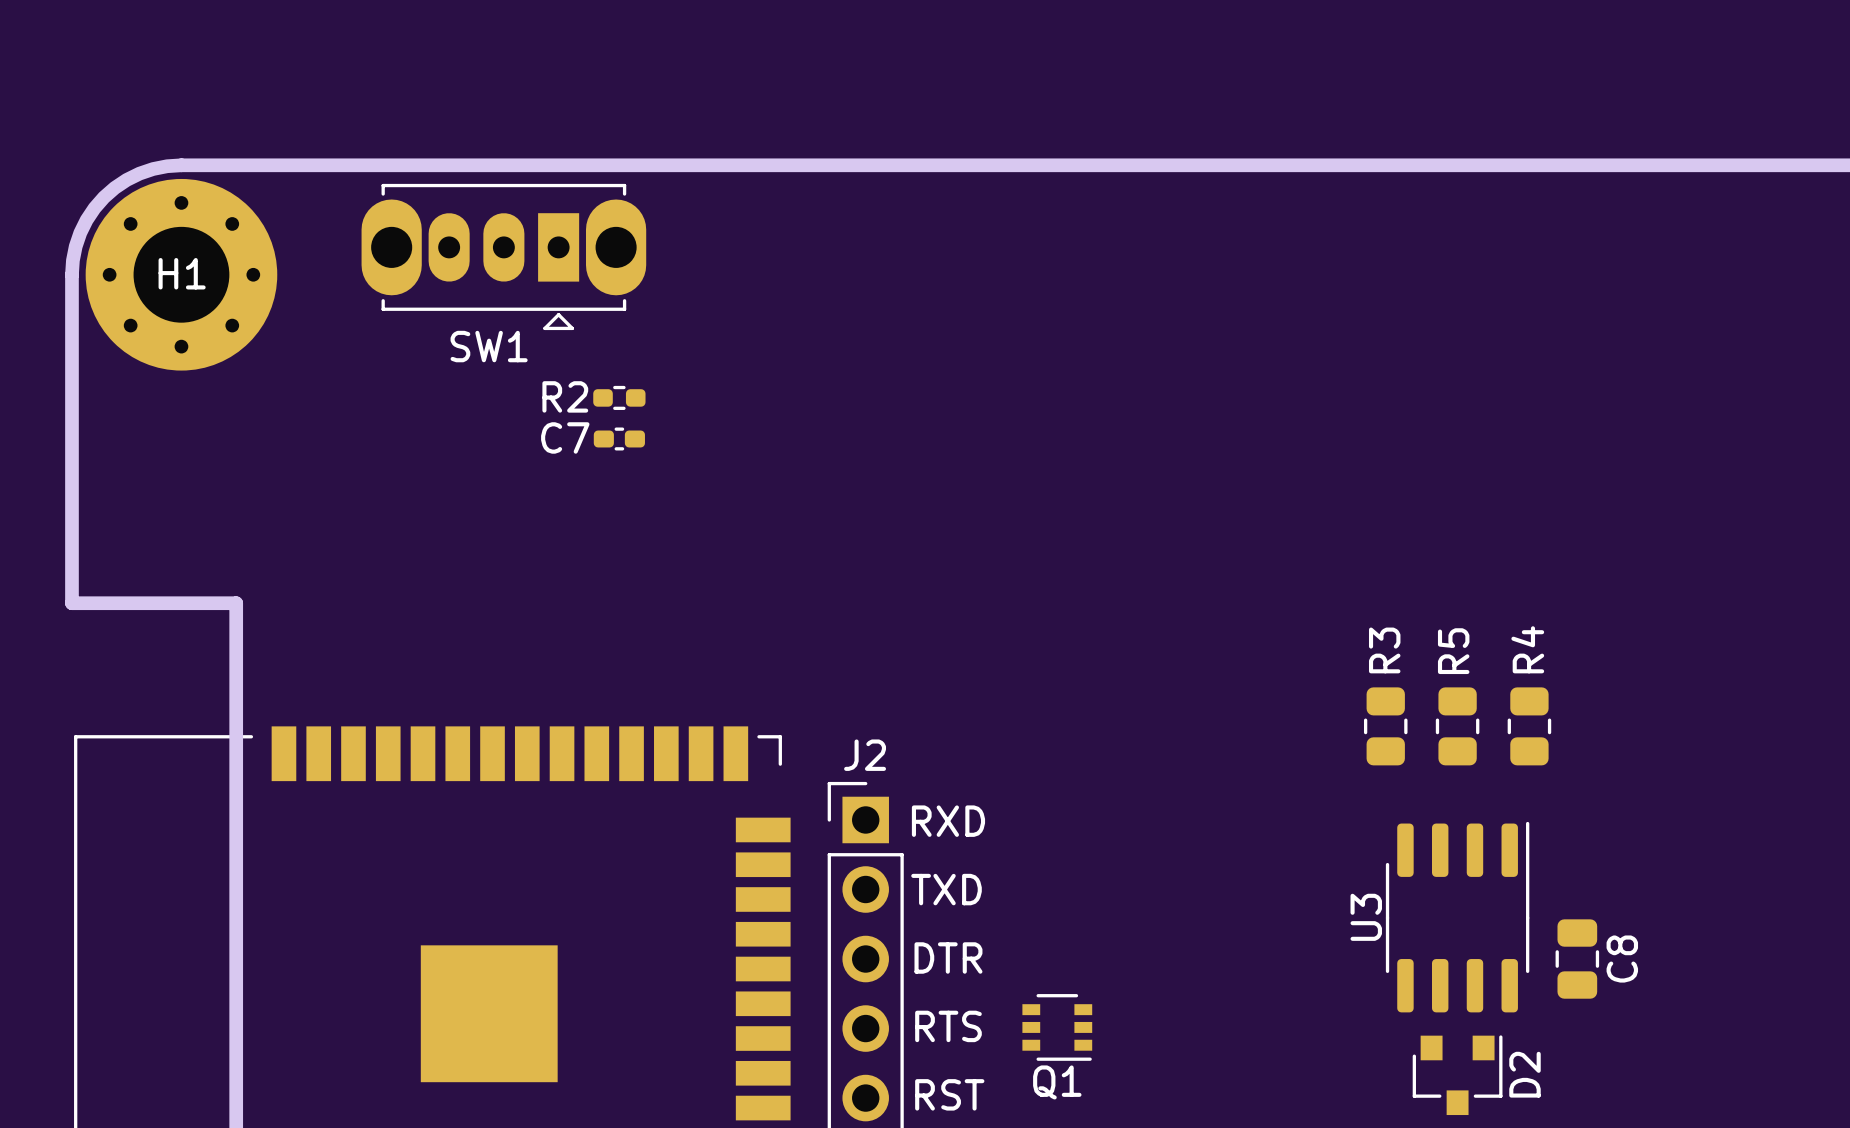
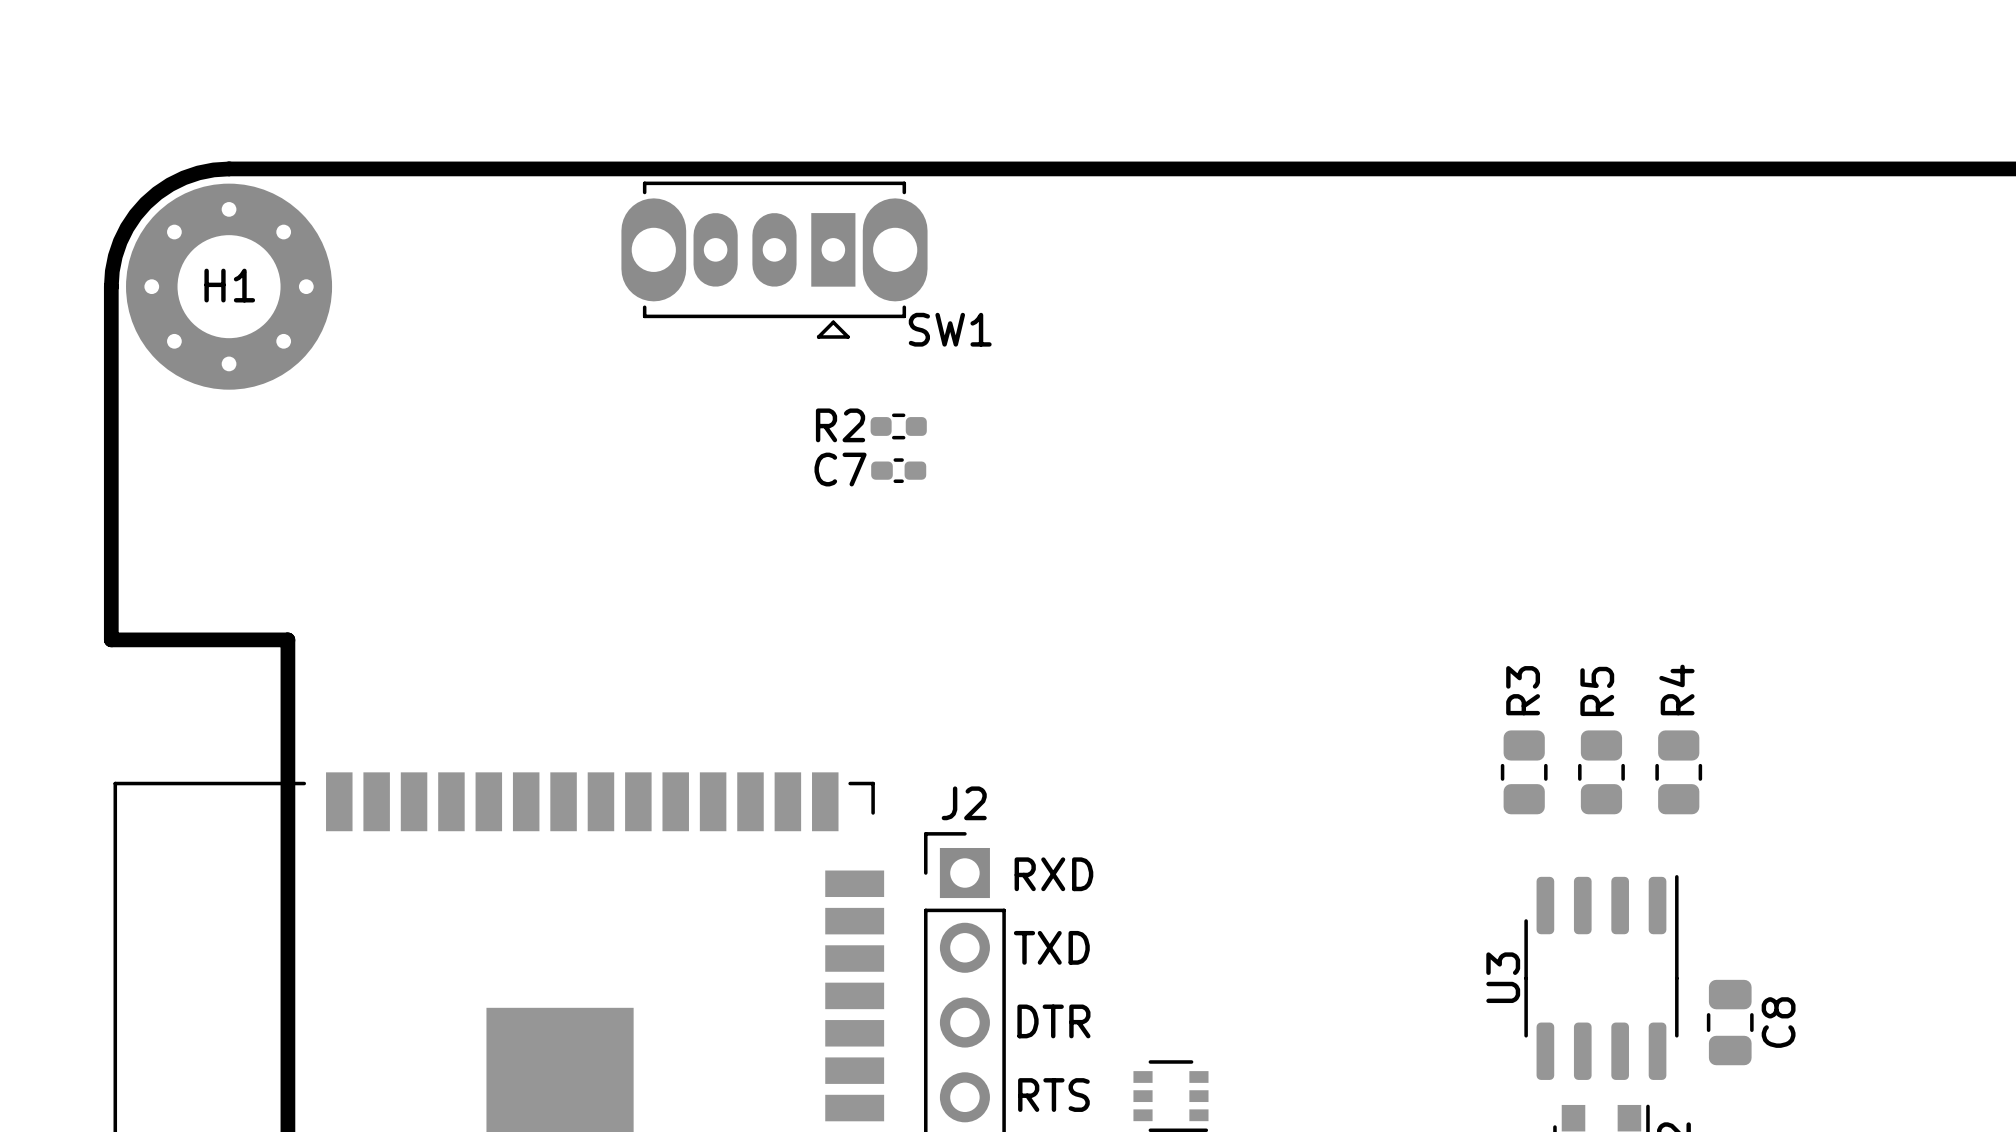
SW1 position: (503, 256) -> (774, 260)
SW1 name position: SW1 (489, 346) -> SW1 (950, 329)
R2 position: (619, 397) -> (898, 426)
C7 position: (619, 438) -> (898, 470)

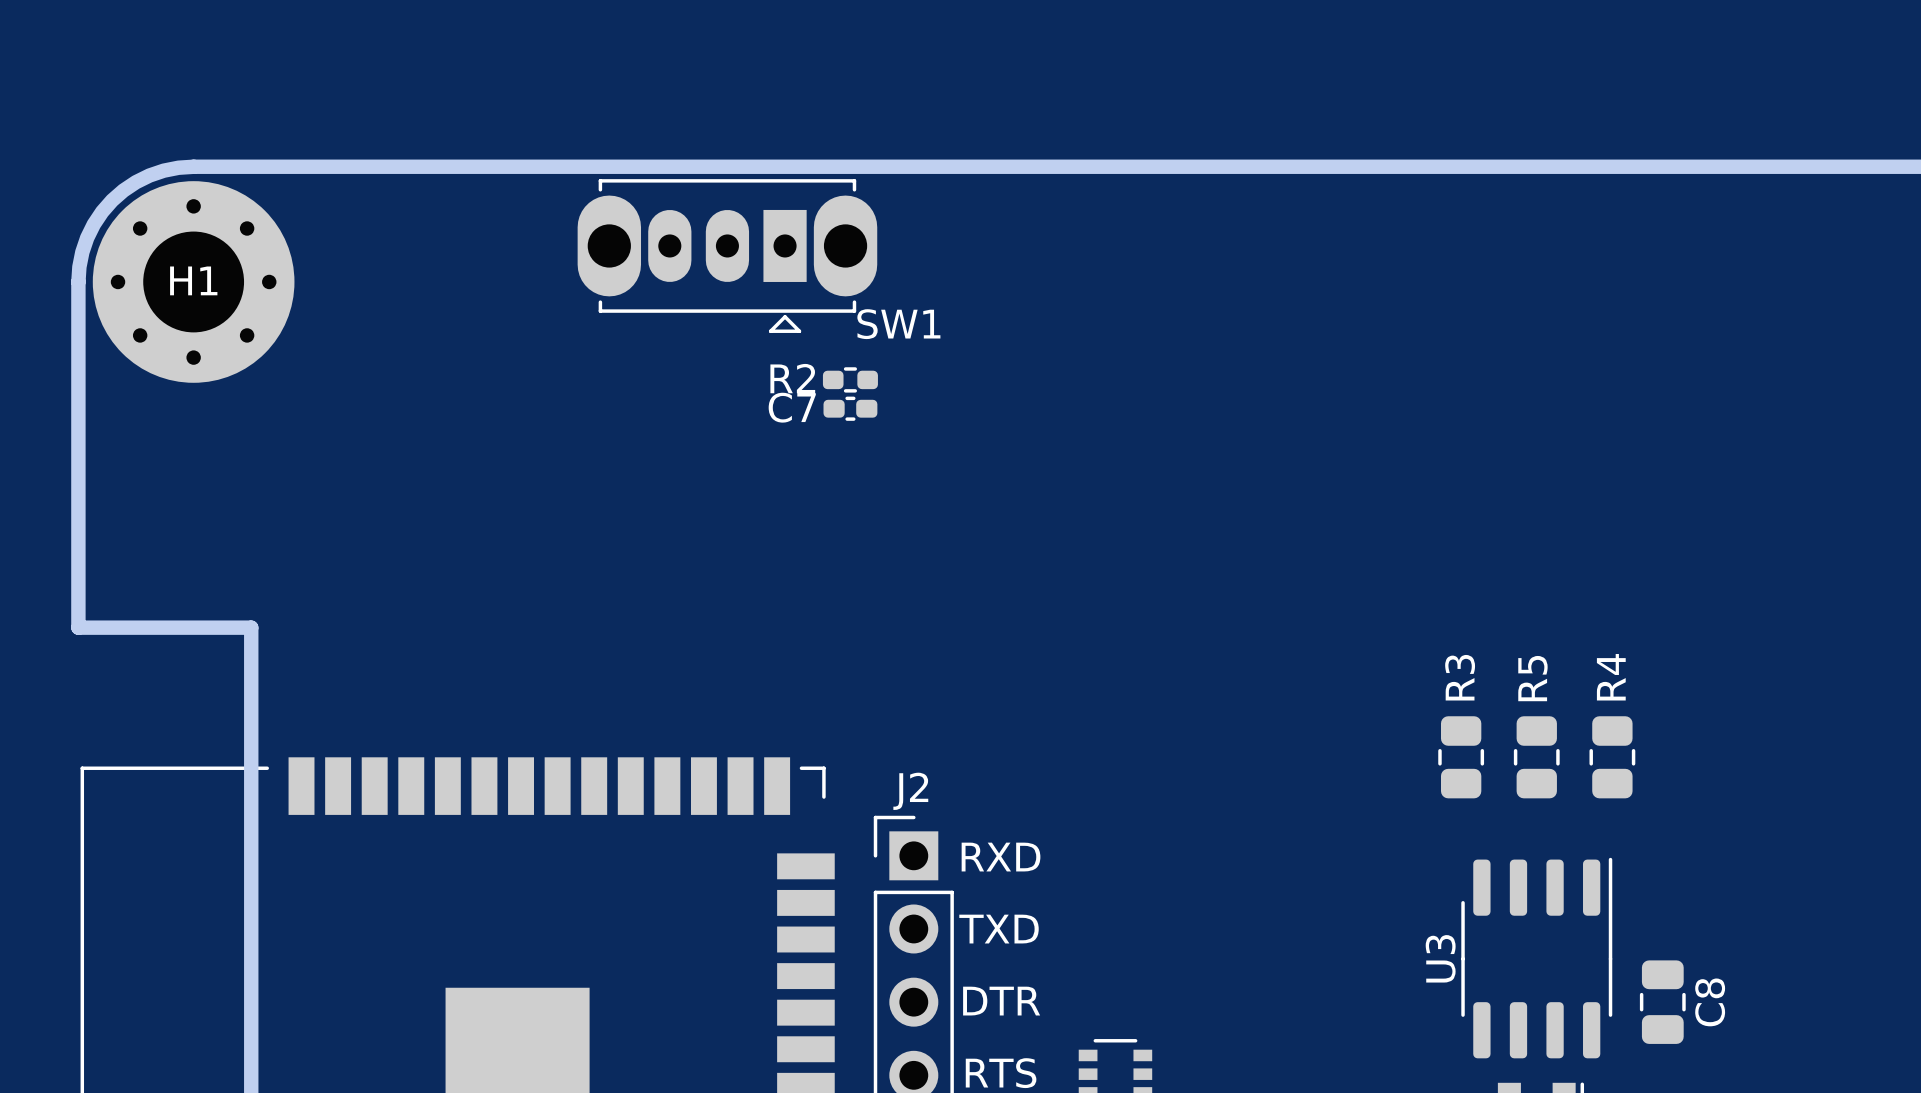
R2 position: (898, 426) -> (850, 379)
C7 position: (898, 470) -> (850, 408)

